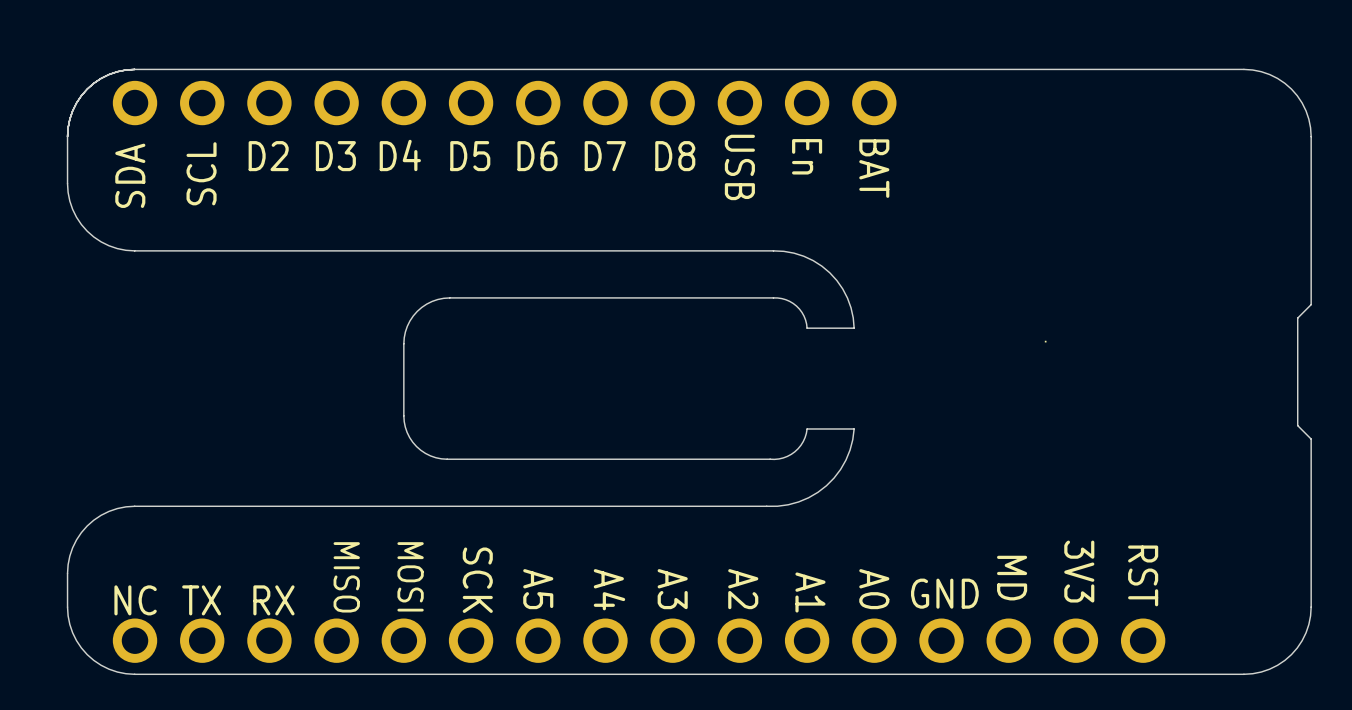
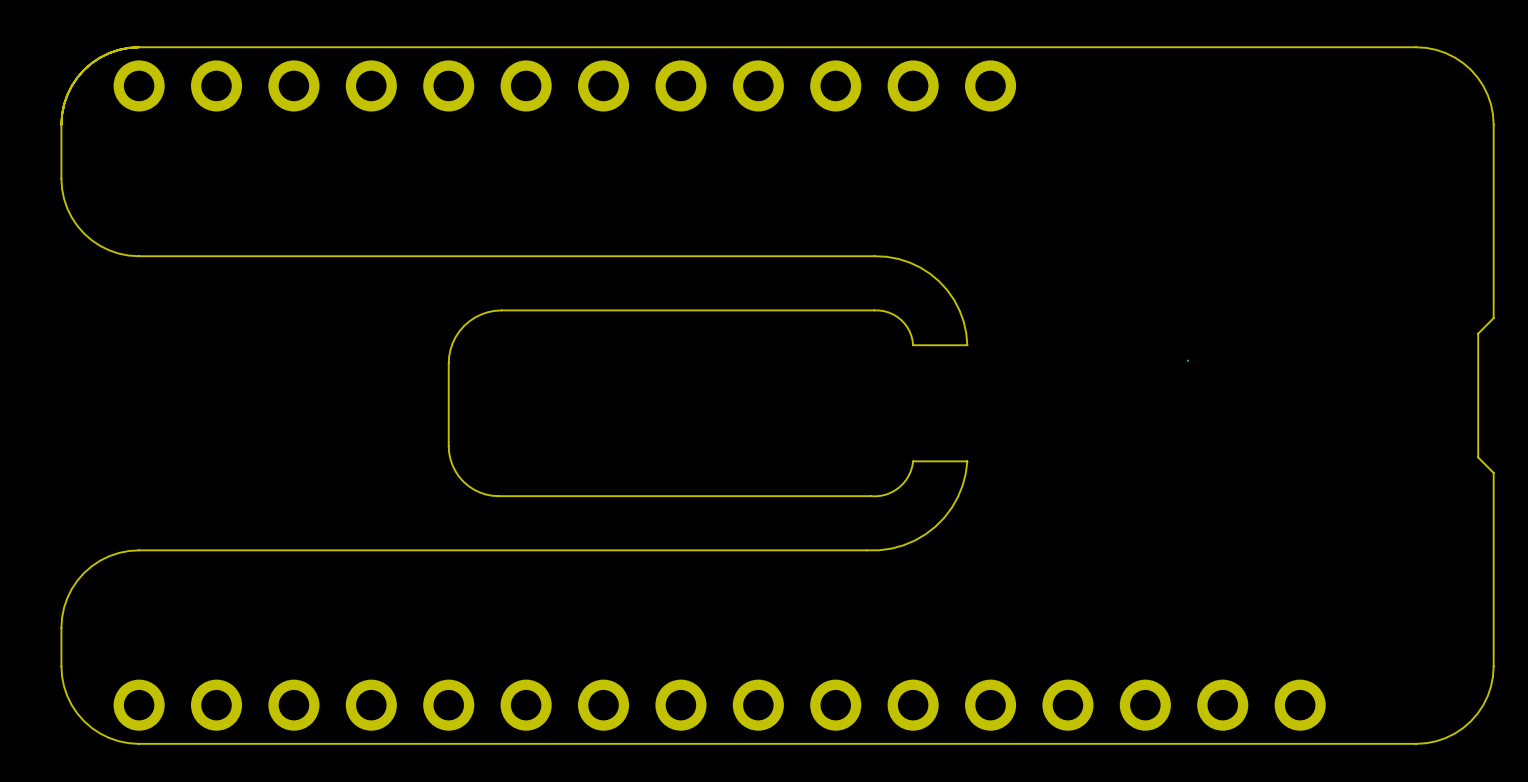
text: D4 (400, 155) -> none
text: D2 (268, 156) -> none
text: D3 (335, 156) -> none
text: D5 (470, 156) -> none
text: D6 (537, 156) -> none
text: D7 (605, 156) -> none
text: D8 (675, 156) -> none
text: En (807, 156) -> none
text: USB (739, 167) -> none
text: BAT (874, 168) -> none
text: SCL (201, 173) -> none
text: SDA (130, 175) -> none
text: 3V3 (1079, 571) -> none
text: RST (1143, 575) -> none
text: MOSI (410, 576) -> none
text: MISO (346, 577) -> none
text: MD (1012, 578) -> none
text: SCK (477, 580) -> none
text: A5 (538, 589) -> none
text: A4 (609, 589) -> none
text: A3 (672, 589) -> none
text: A2 (743, 589) -> none
text: A0 (874, 589) -> none
text: A1 (810, 592) -> none
text: GND (944, 593) -> none
text: NC (135, 600) -> none
text: TX (201, 600) -> none
text: RX (273, 600) -> none

